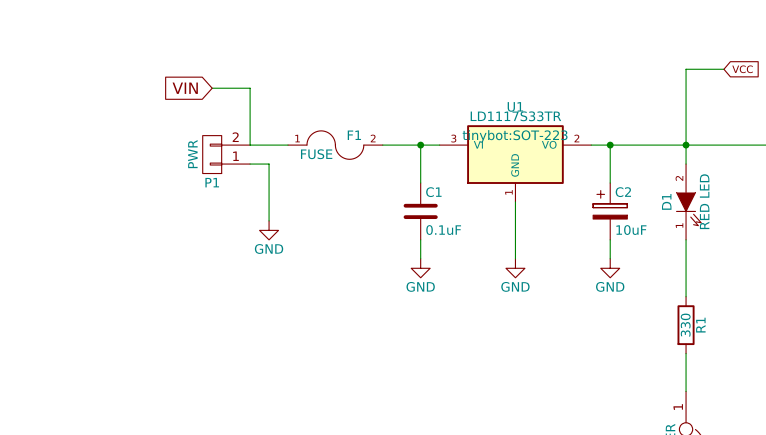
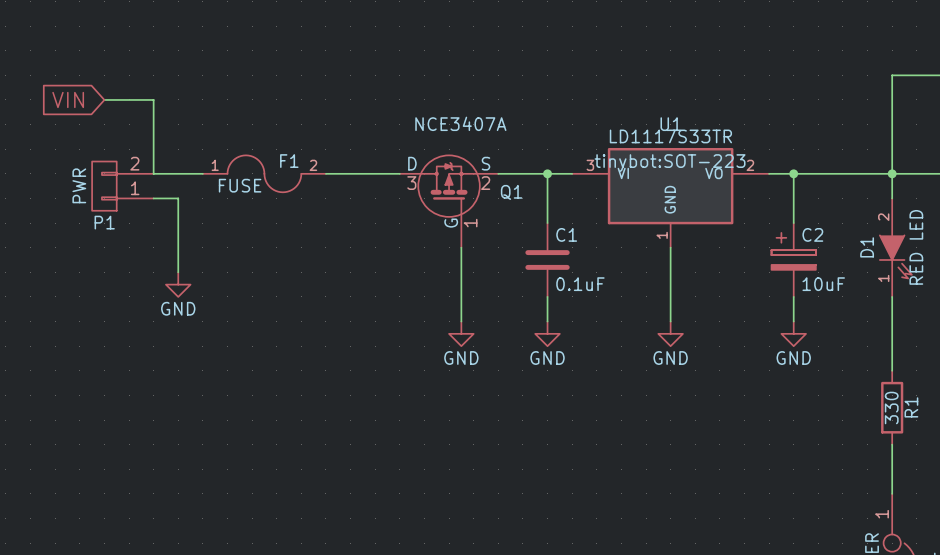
wire: none -> (104, 99) (153, 99) (153, 173) (202, 173)
global label position: VIN (185, 88) -> VIN (68, 99)
wire: (212, 88) (250, 88) (250, 145) -> none
F1 position: (335, 145) -> (264, 173)
P1 position: (226, 154) -> (122, 186)
wire: (250, 164) (269, 164) (269, 220) -> (153, 198) (178, 198) (178, 272)
Q1: none -> NCE3407A (449, 201)
wire: none -> (461, 247) (461, 321)
power symbol: none -> GND (178, 284)
power symbol: GND (269, 230) -> none
power symbol: none -> GND (461, 333)

